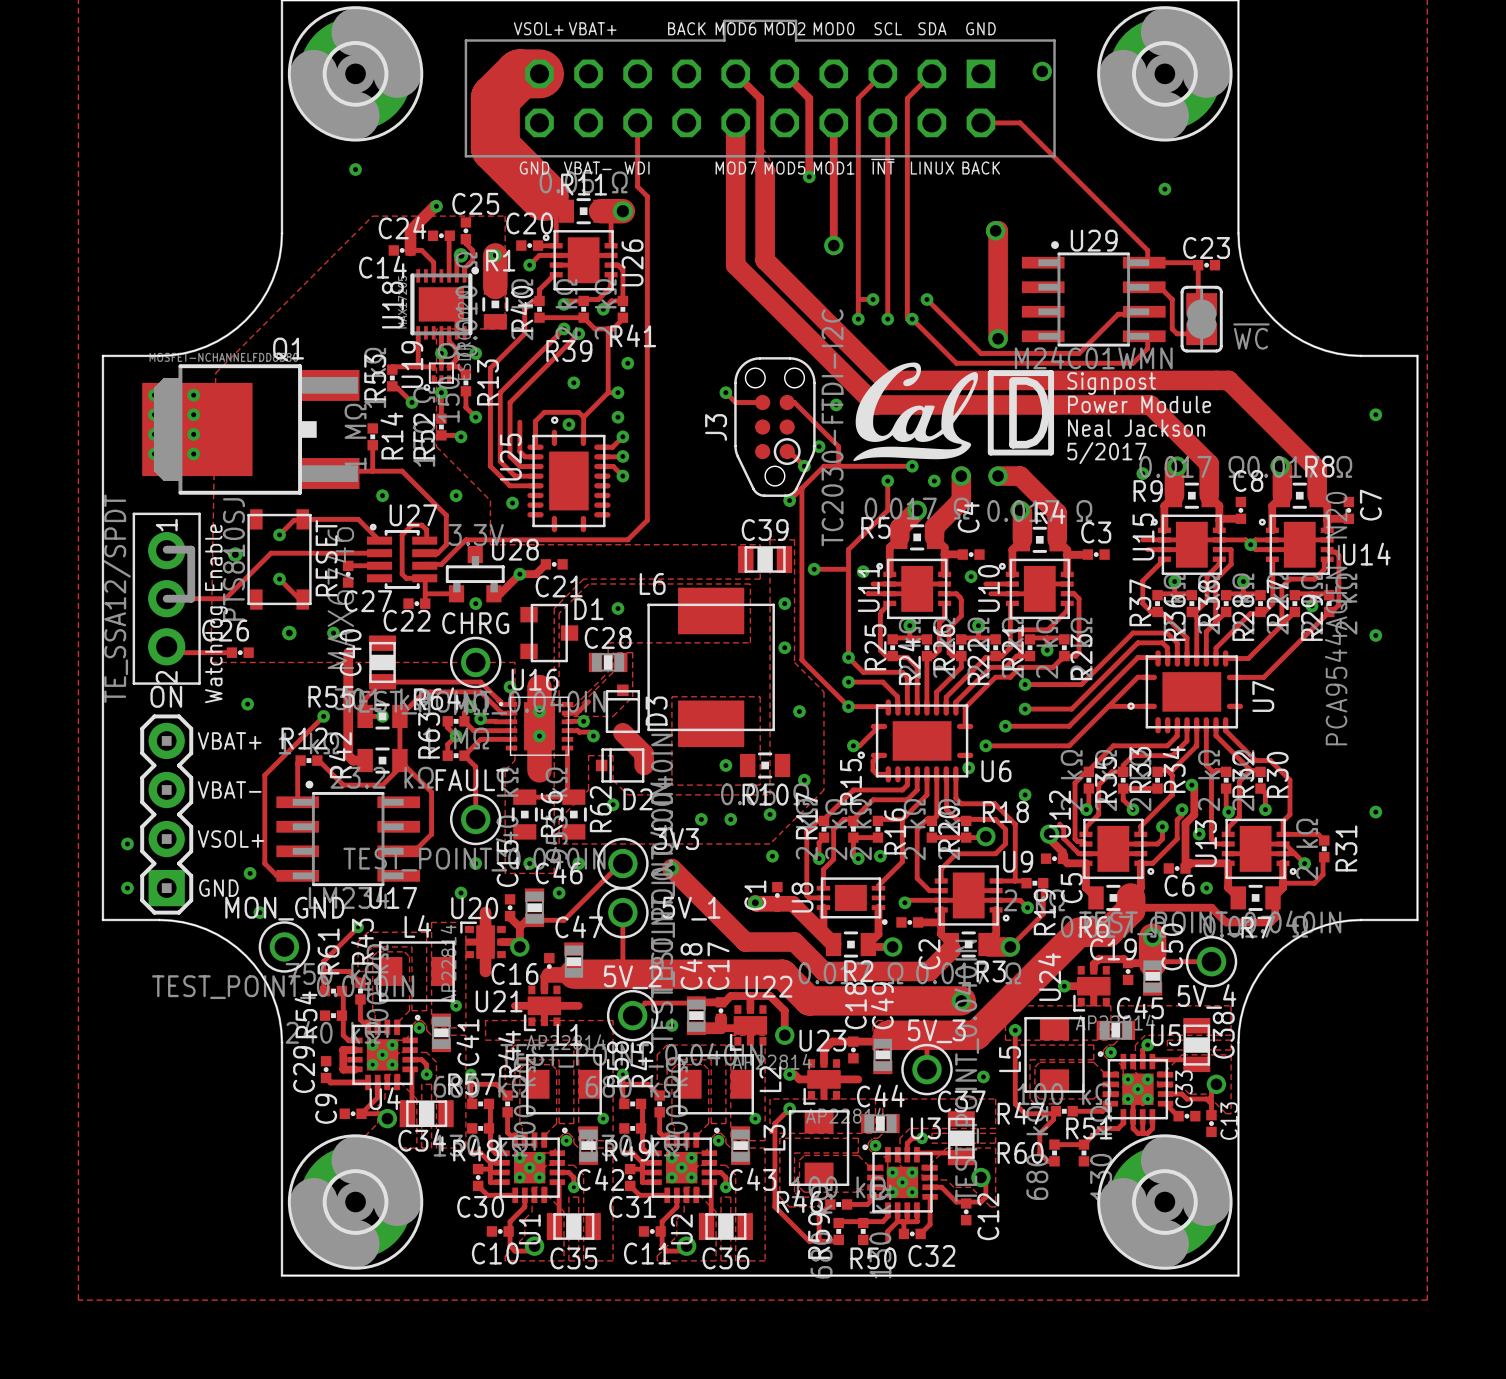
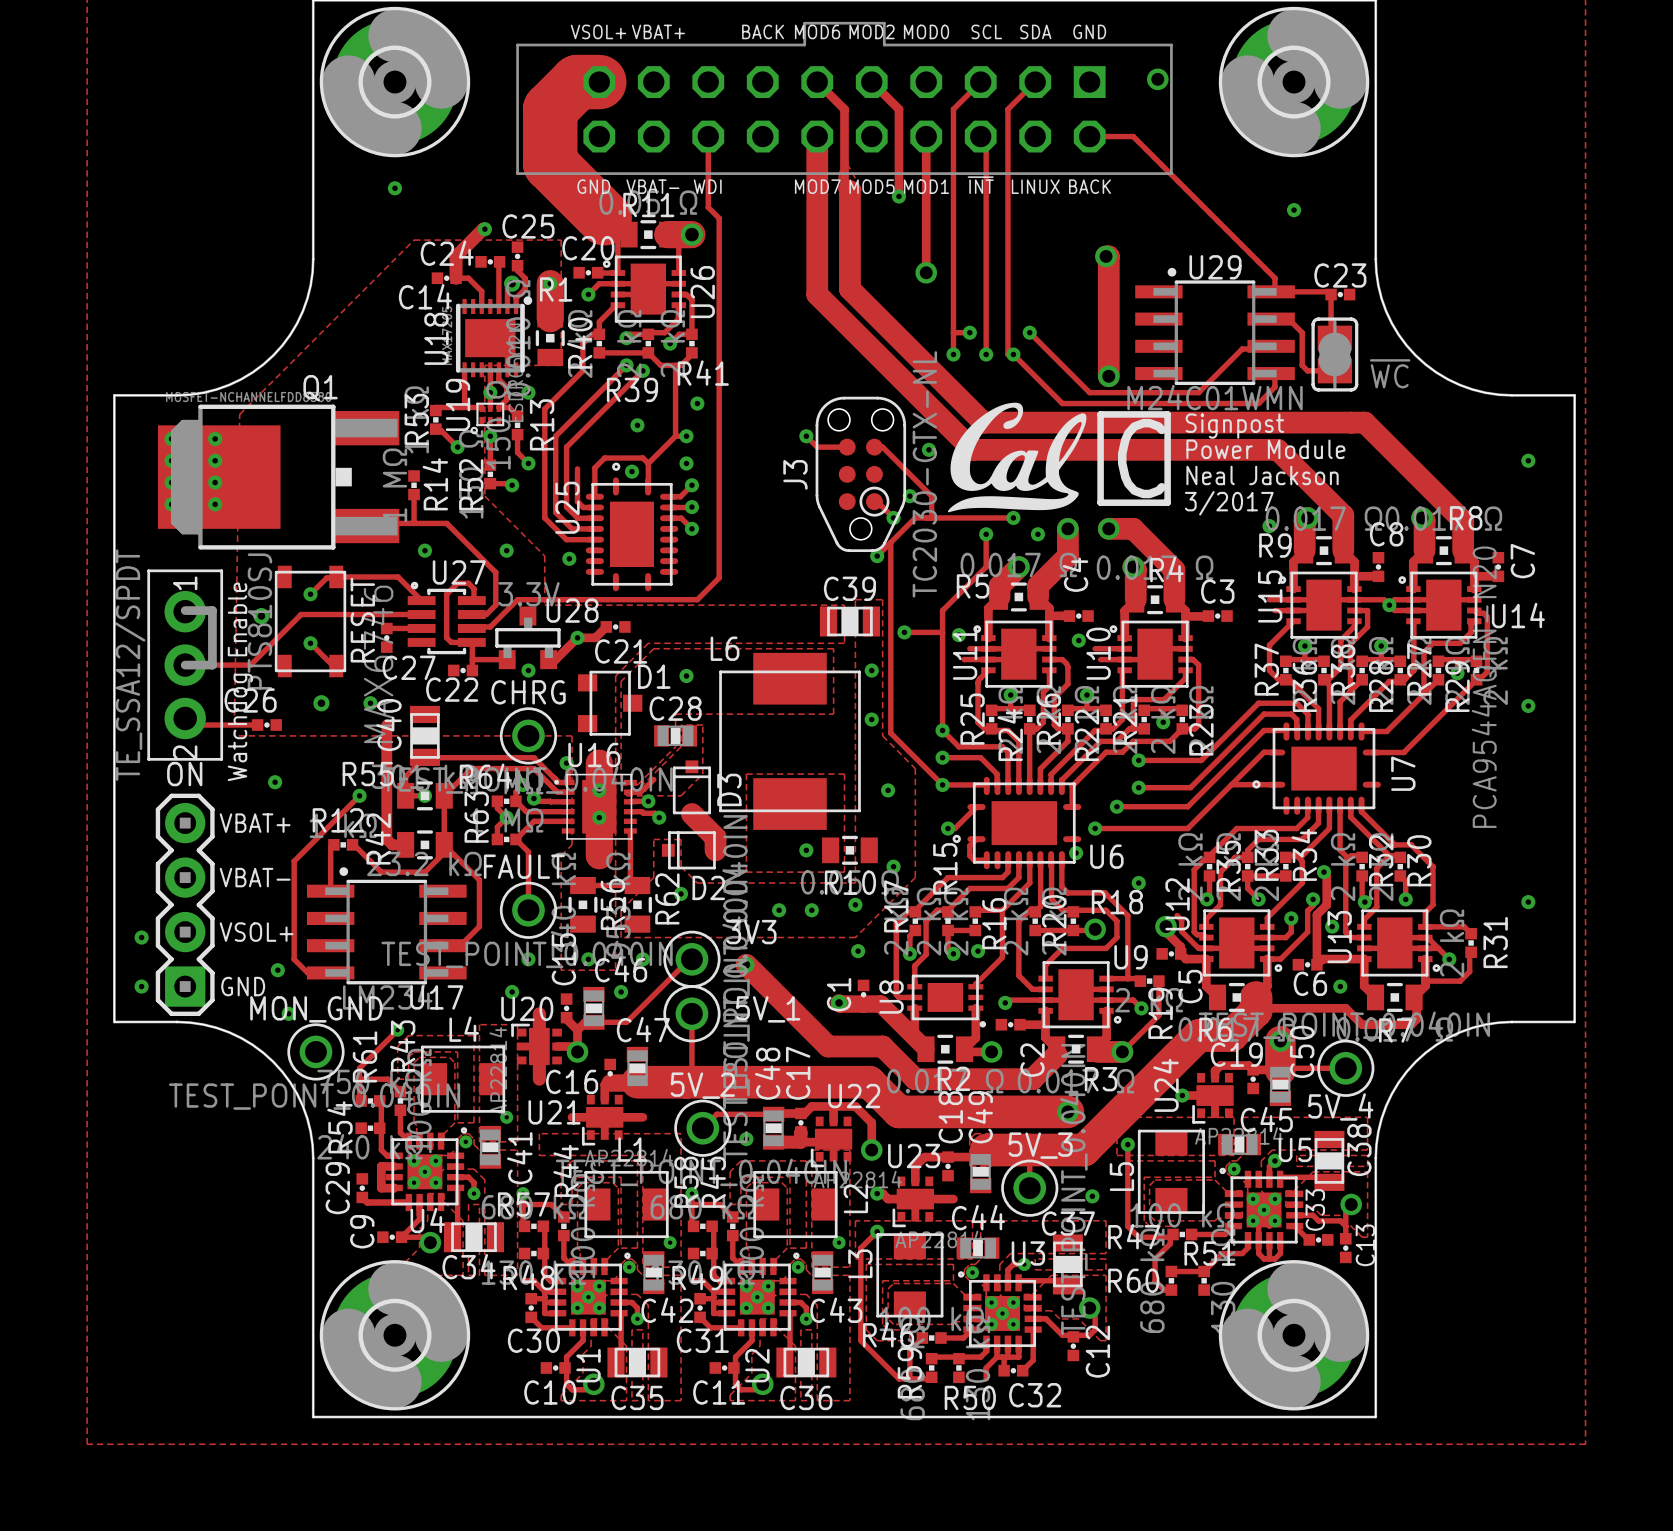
text: D (1029, 412) -> C (1142, 458)
J3 value: TC2030-FTDI-I2C (832, 427) -> TC2030-CTX-NL (924, 474)
text: 5/2017 (1106, 453) -> 3/2017 (1229, 503)

